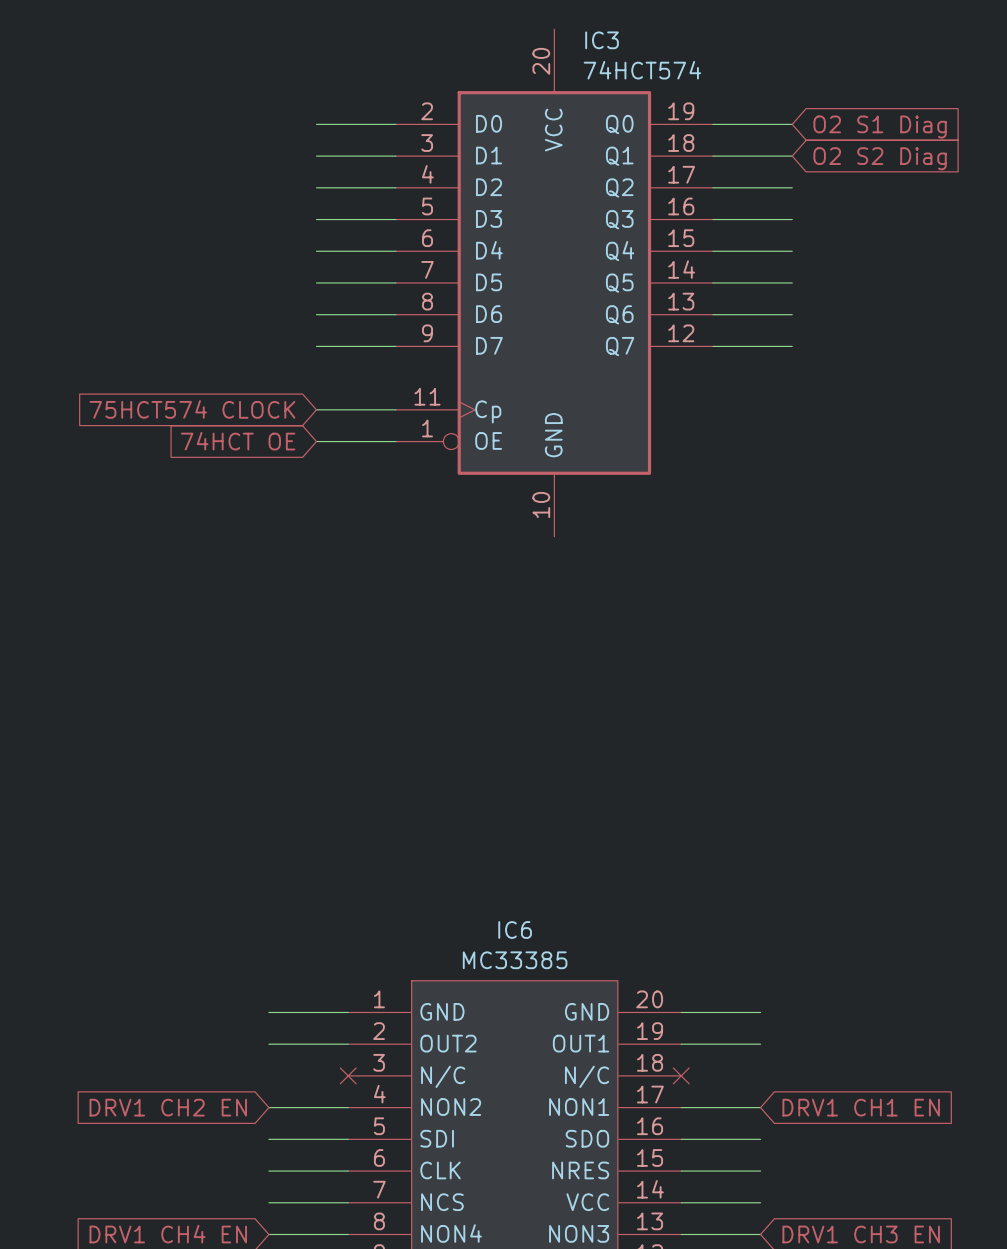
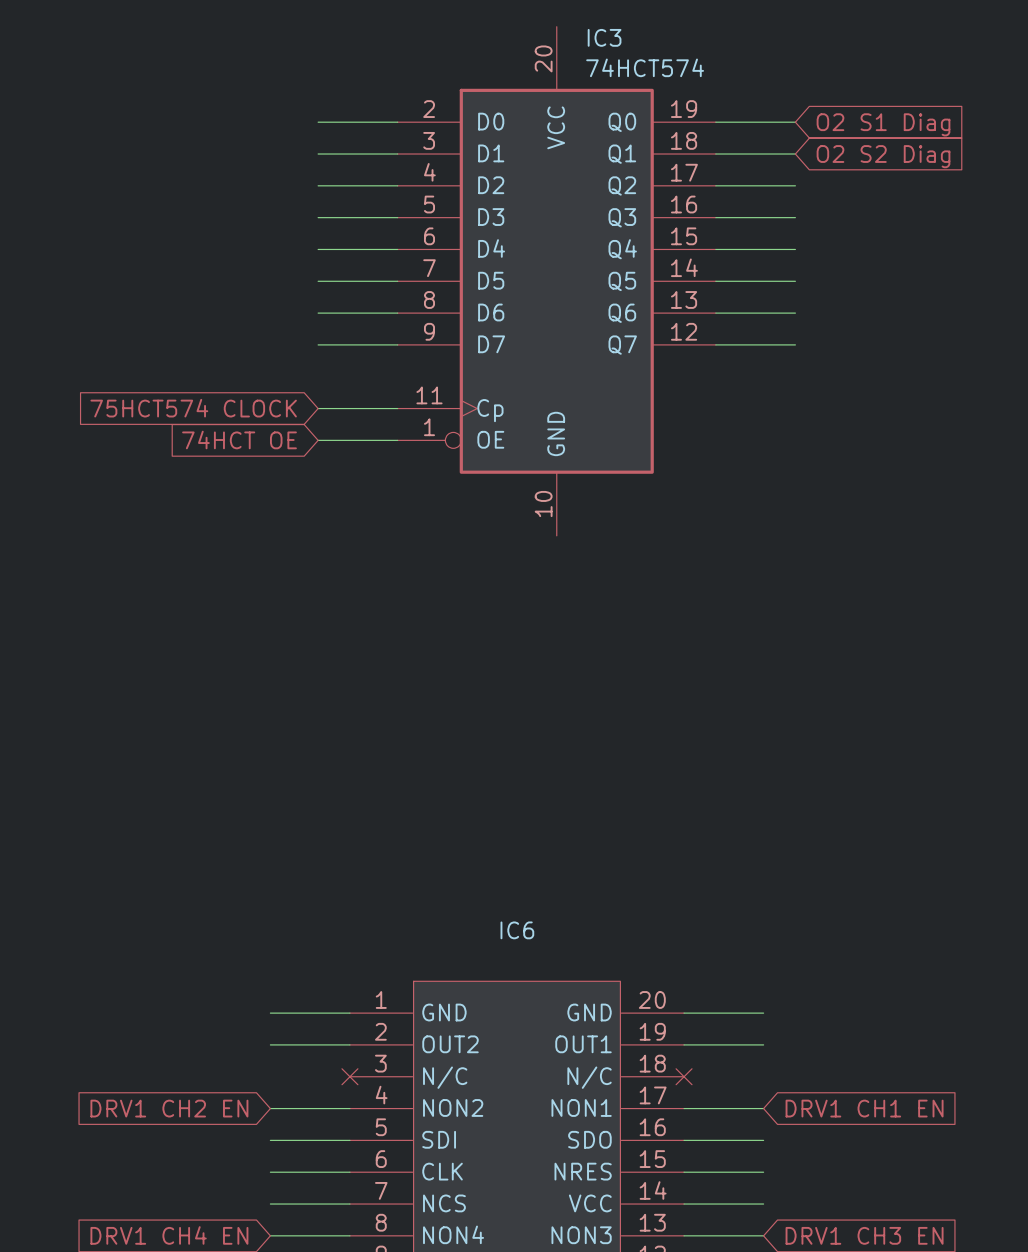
IC6 value: MC33385 (515, 960) -> none

